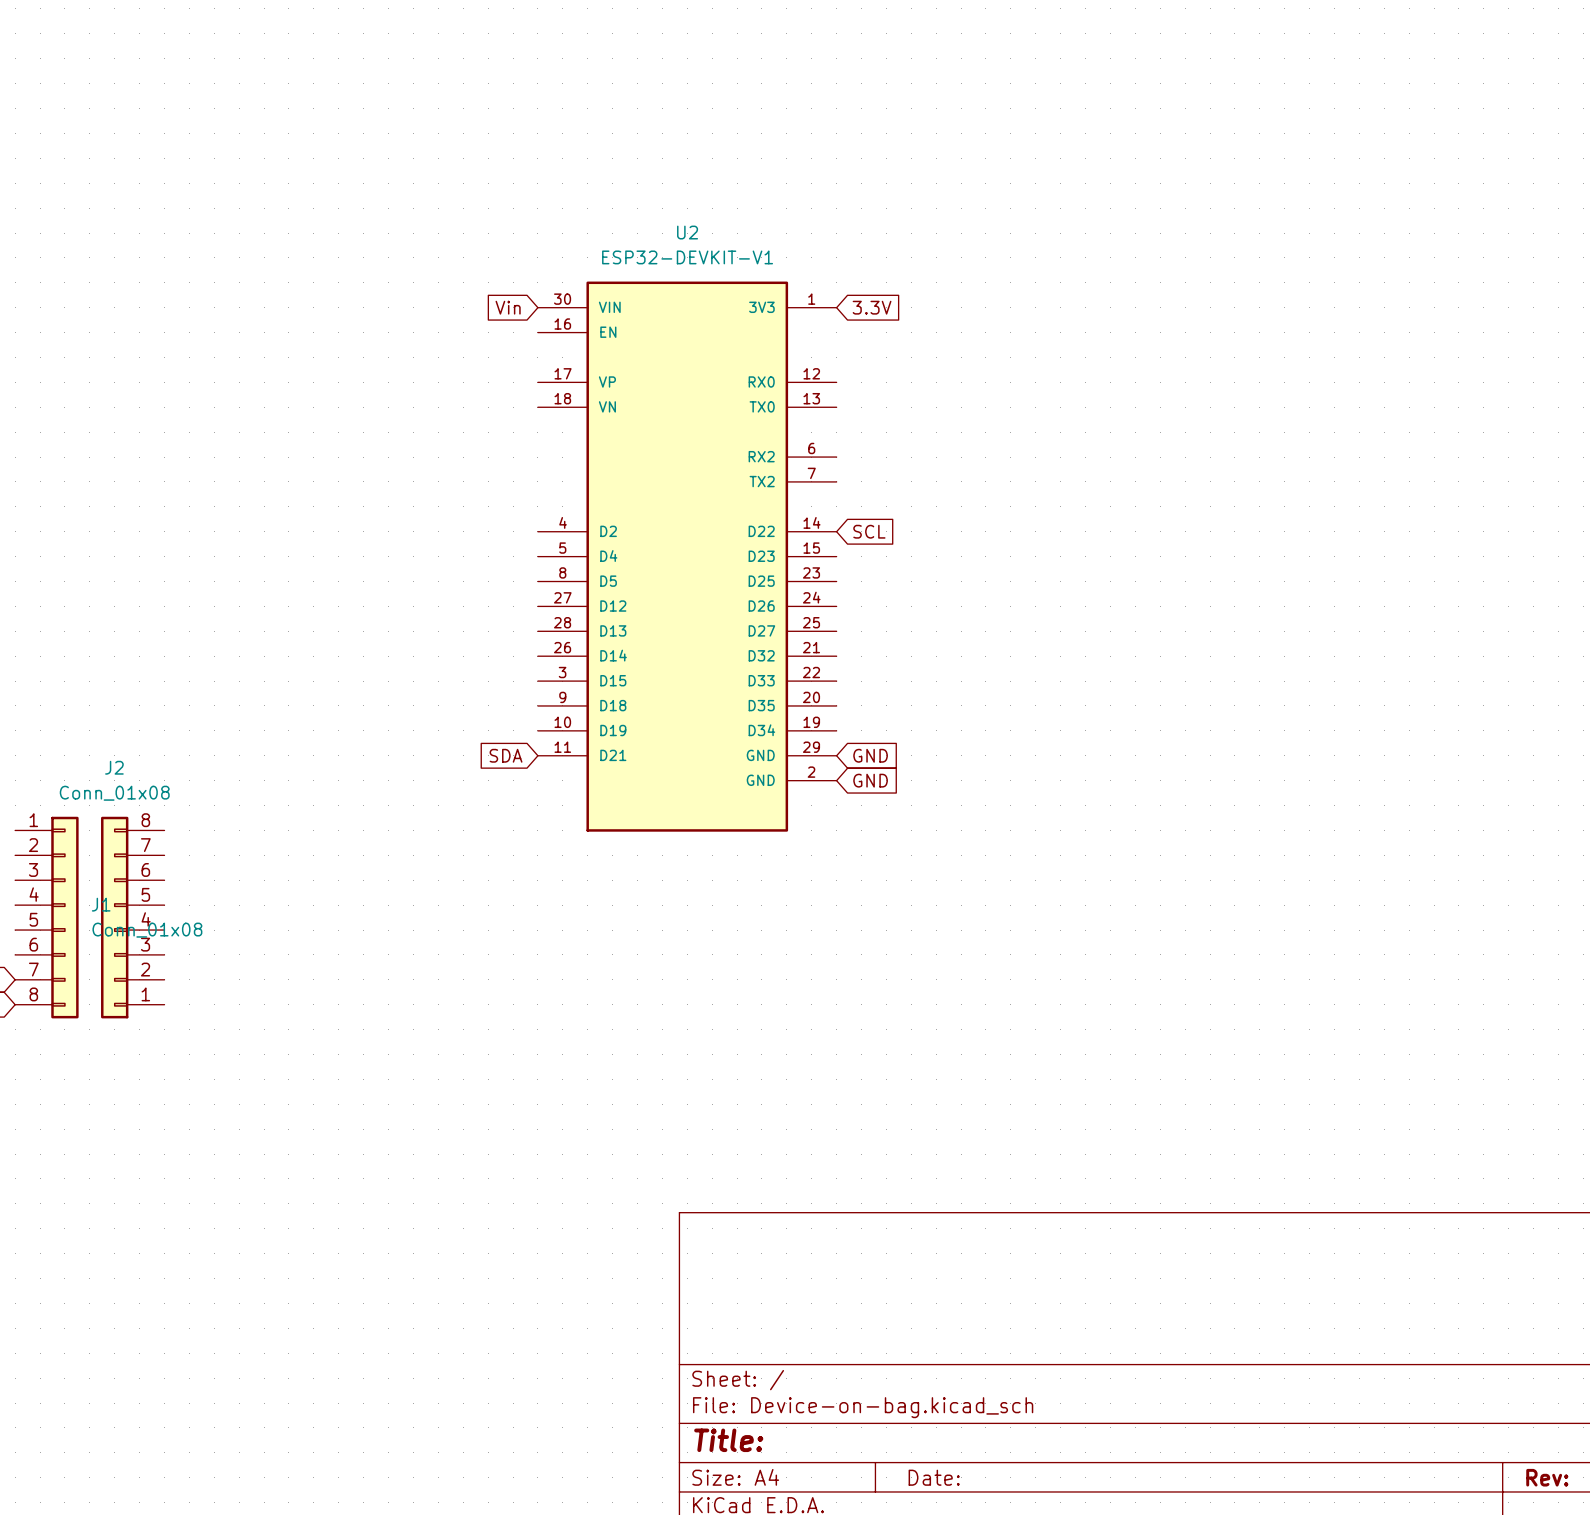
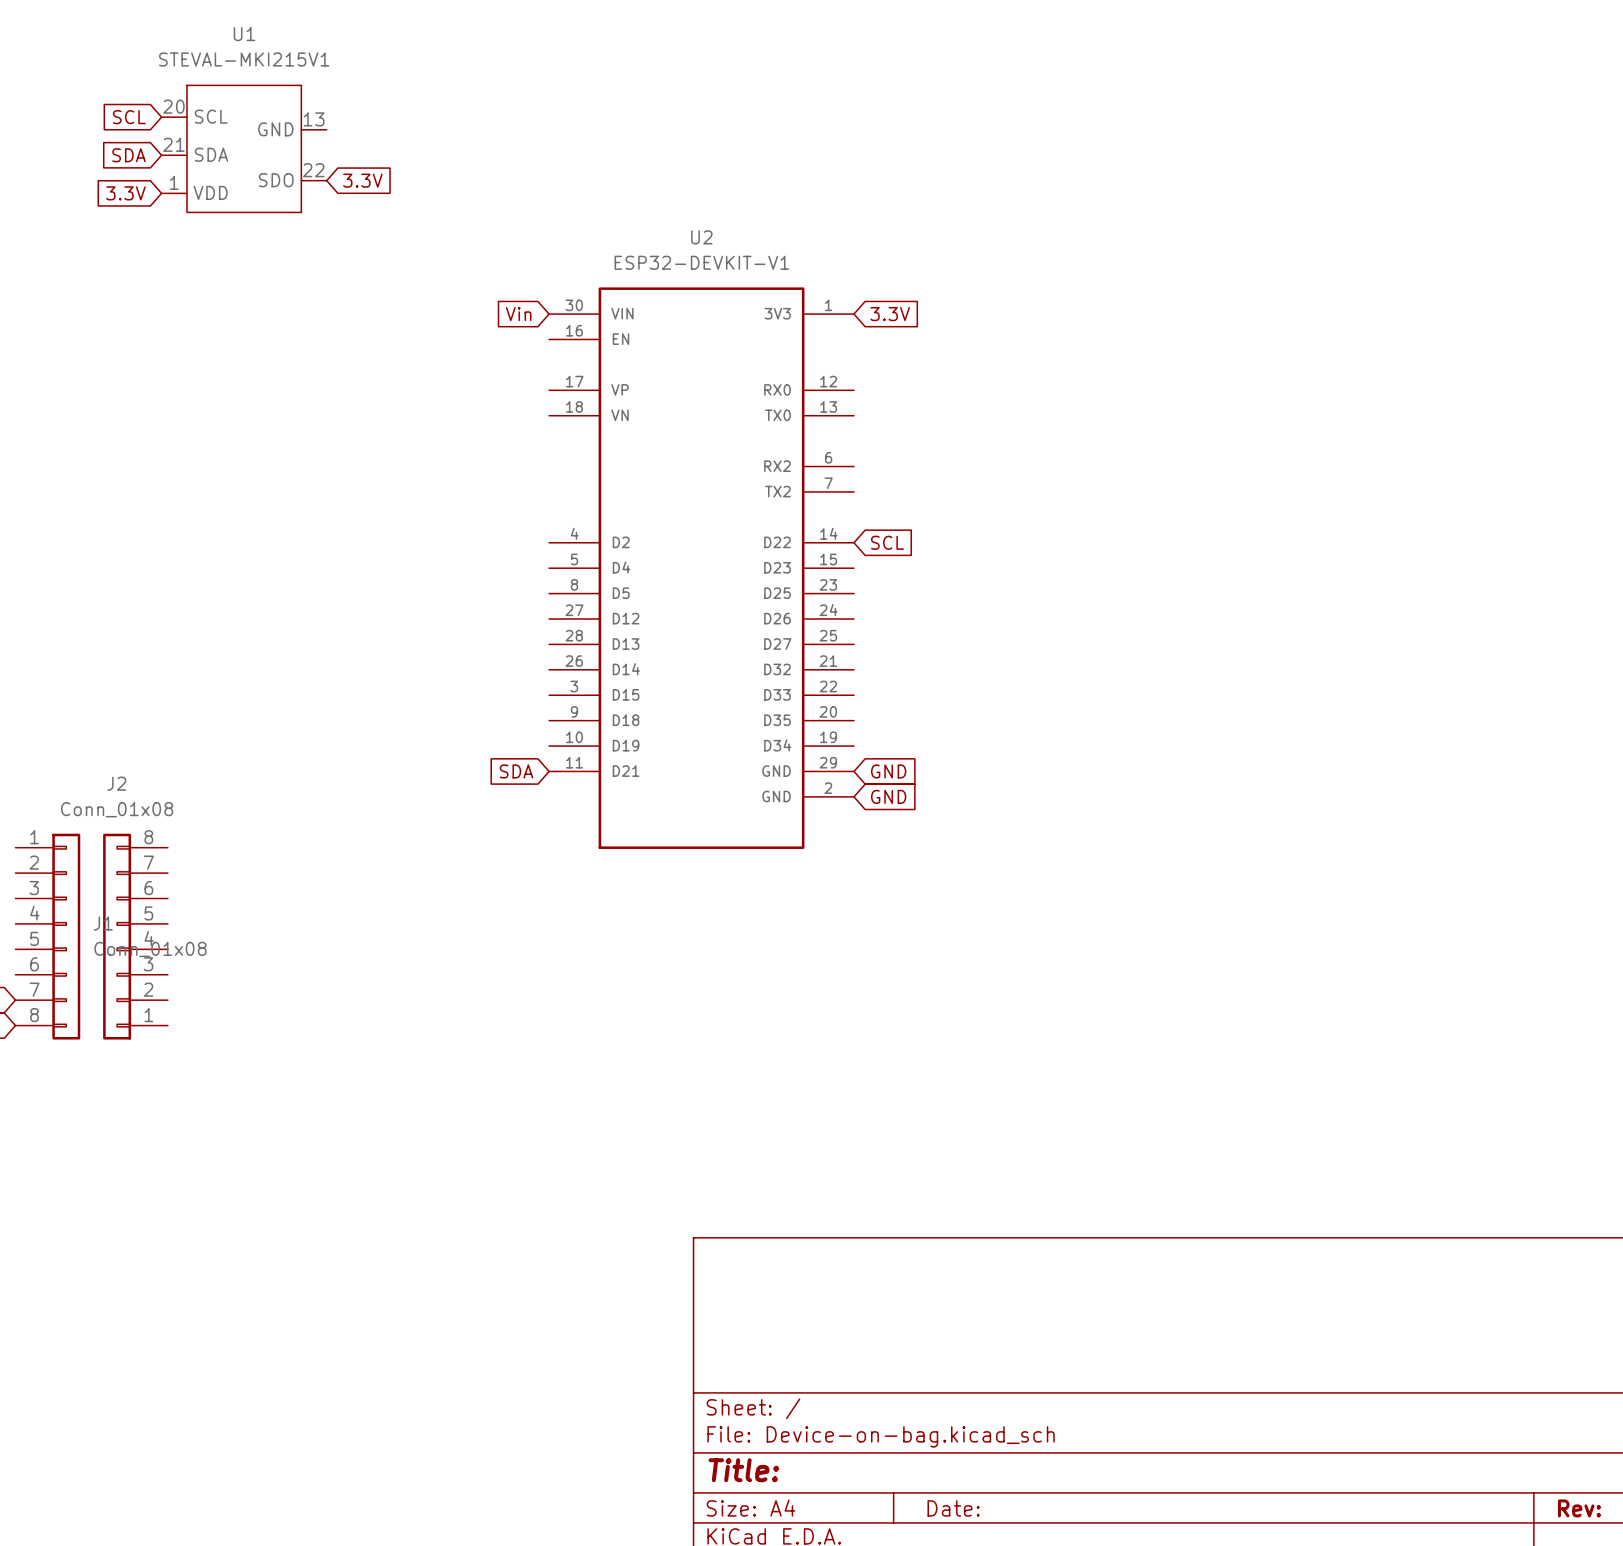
global label: none -> SCL (129, 117)
U1: none -> STEVAL-MKI215V1 (244, 148)
global label: none -> SDA (129, 155)
global label: none -> 3.3V (362, 180)
global label: none -> 3.3V (126, 193)

